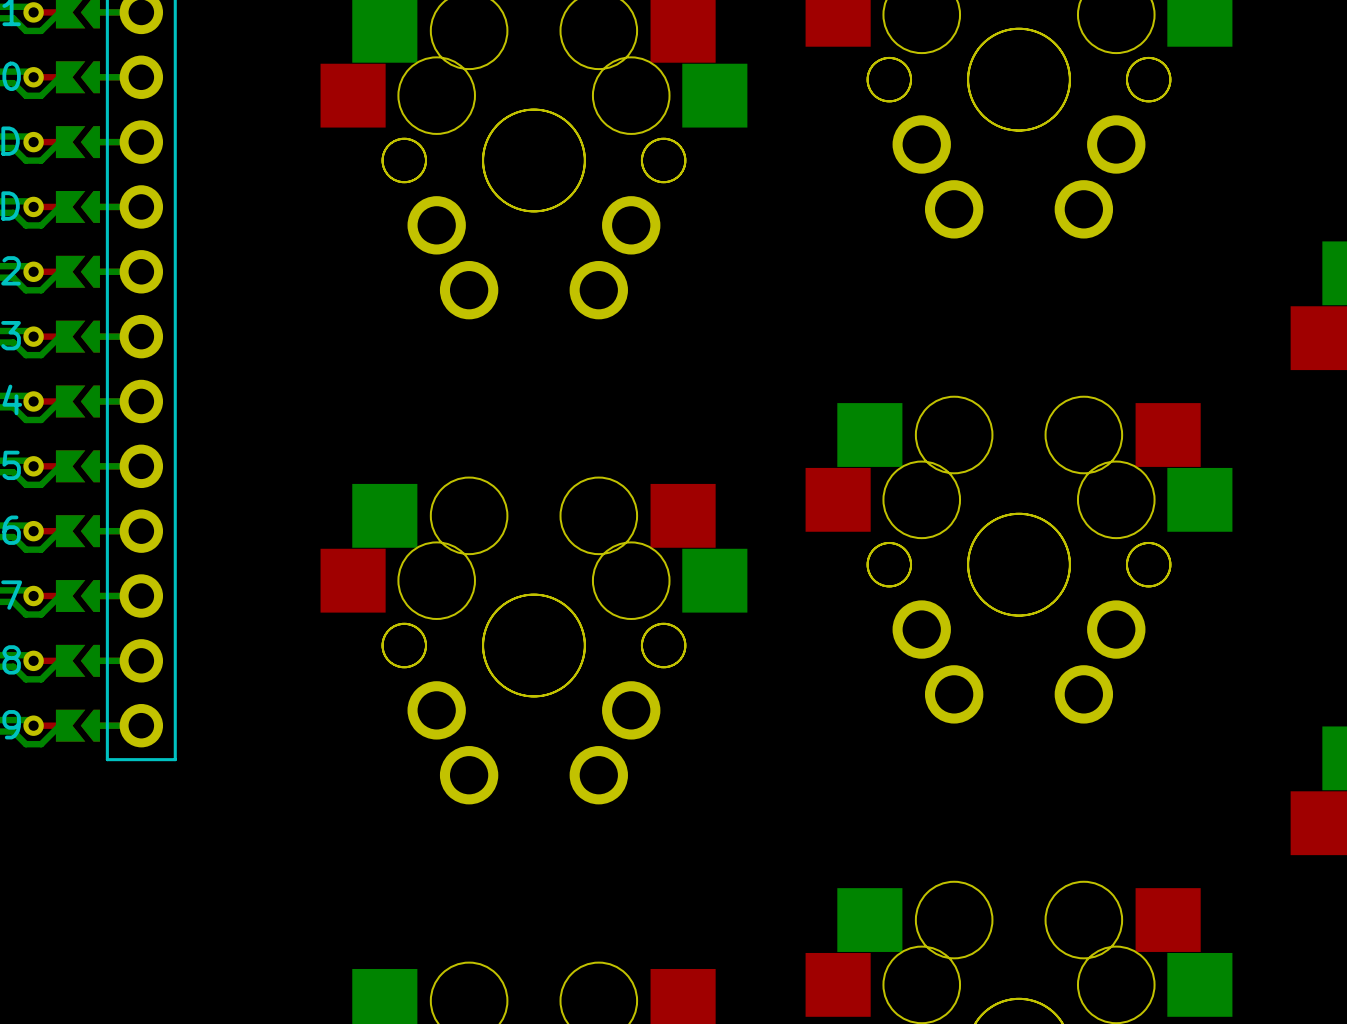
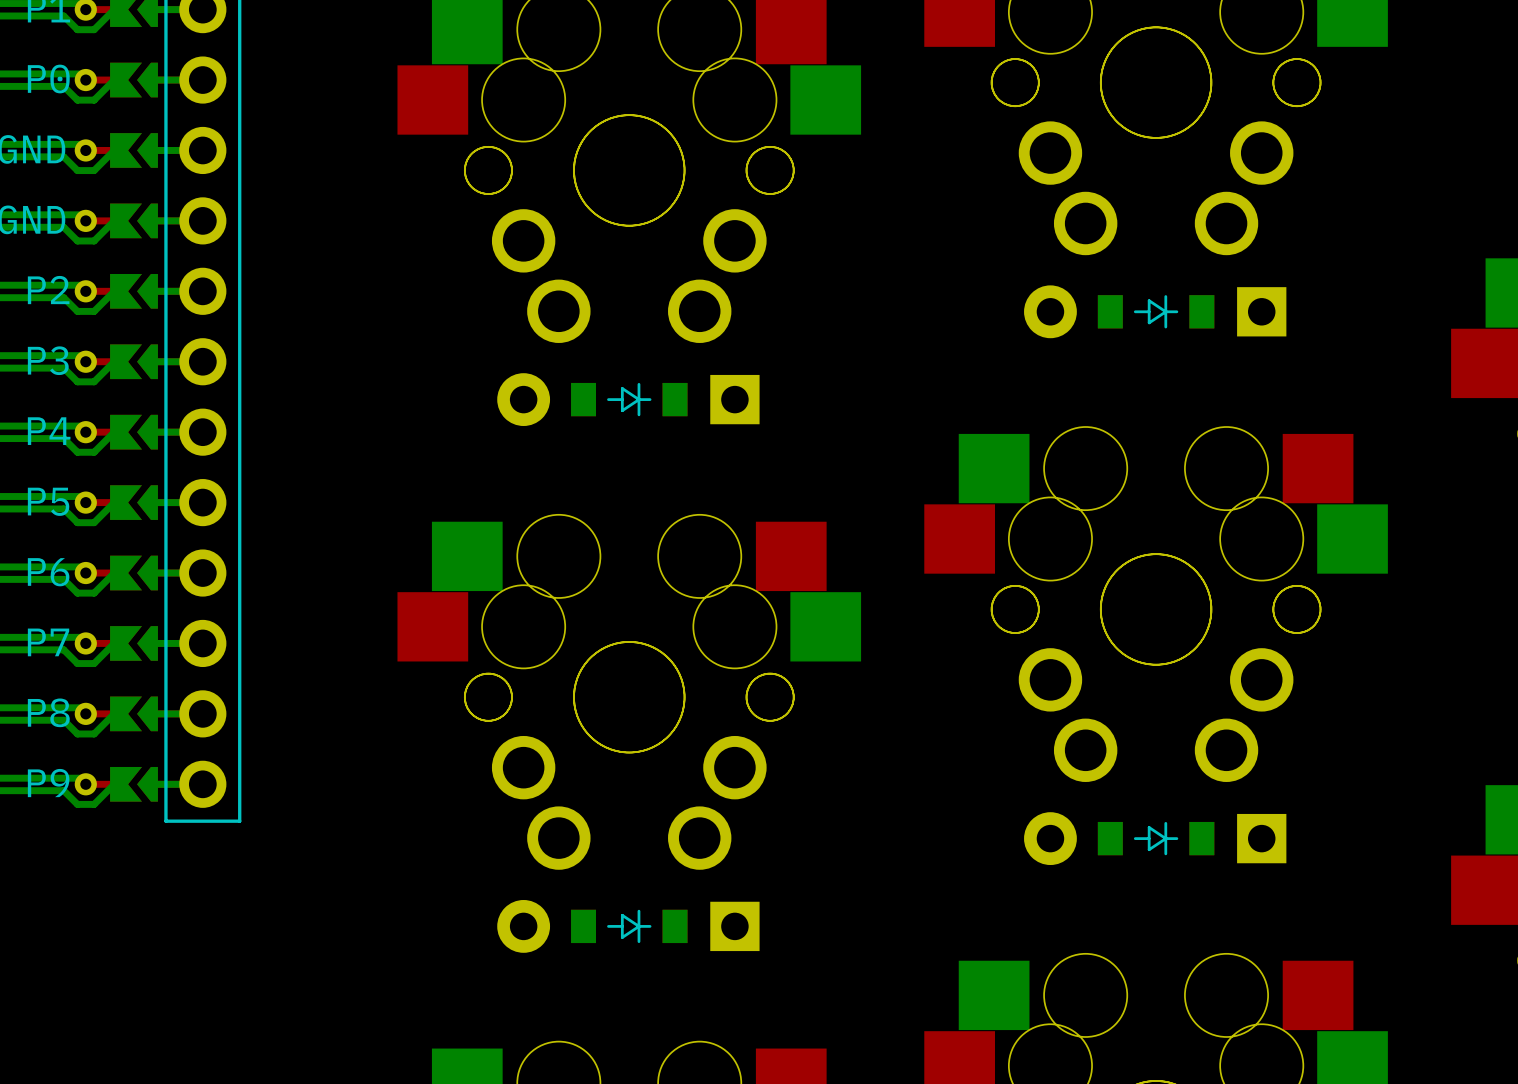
part: none -> (1155, 311)
part: none -> (628, 399)
part: none -> (1155, 838)
part: none -> (628, 926)

